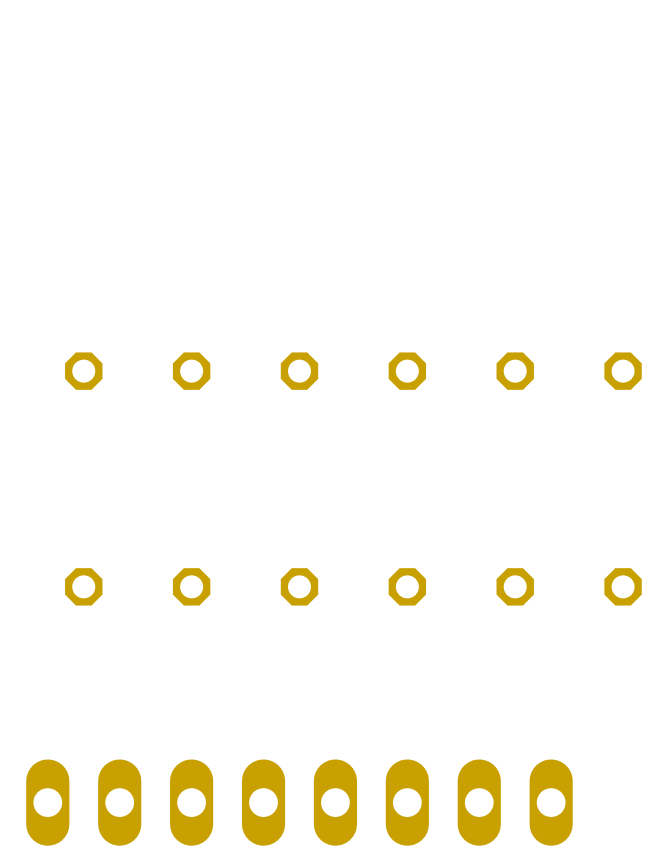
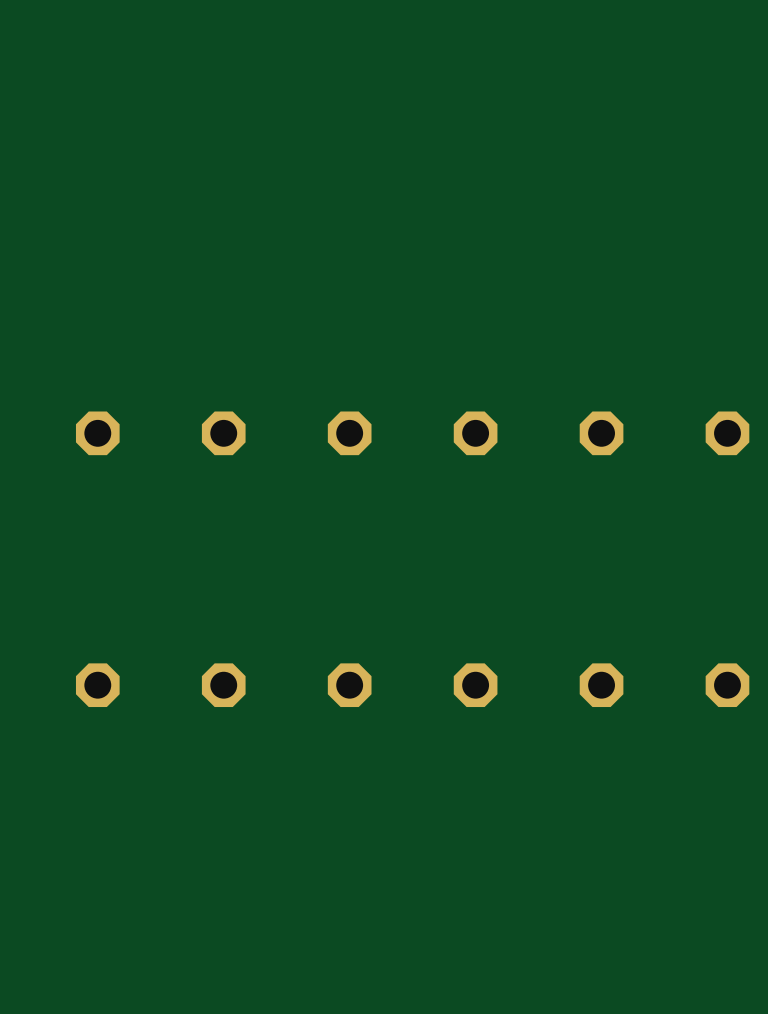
part: (299, 802) -> none

